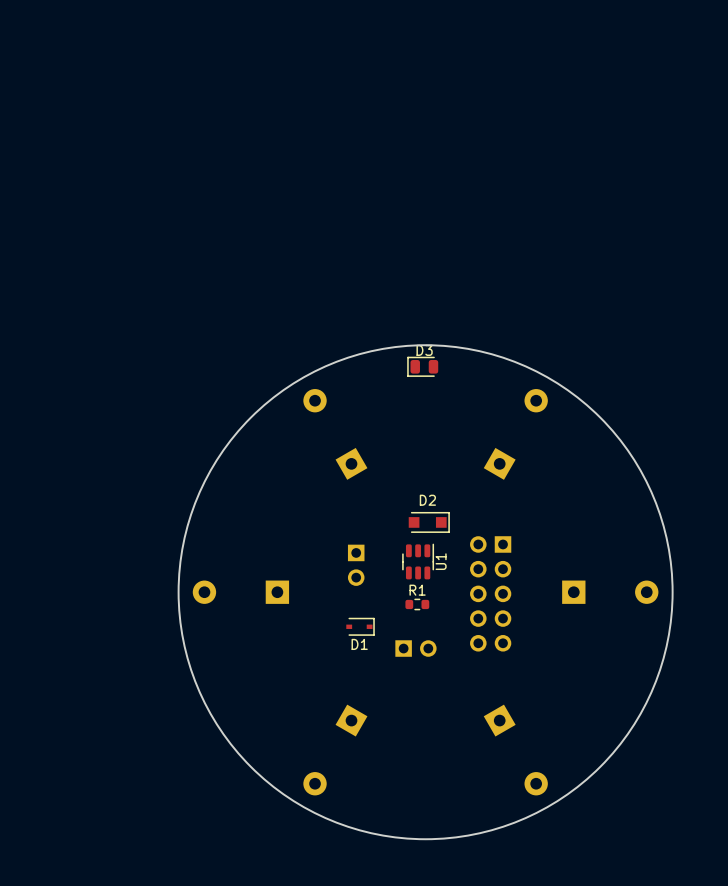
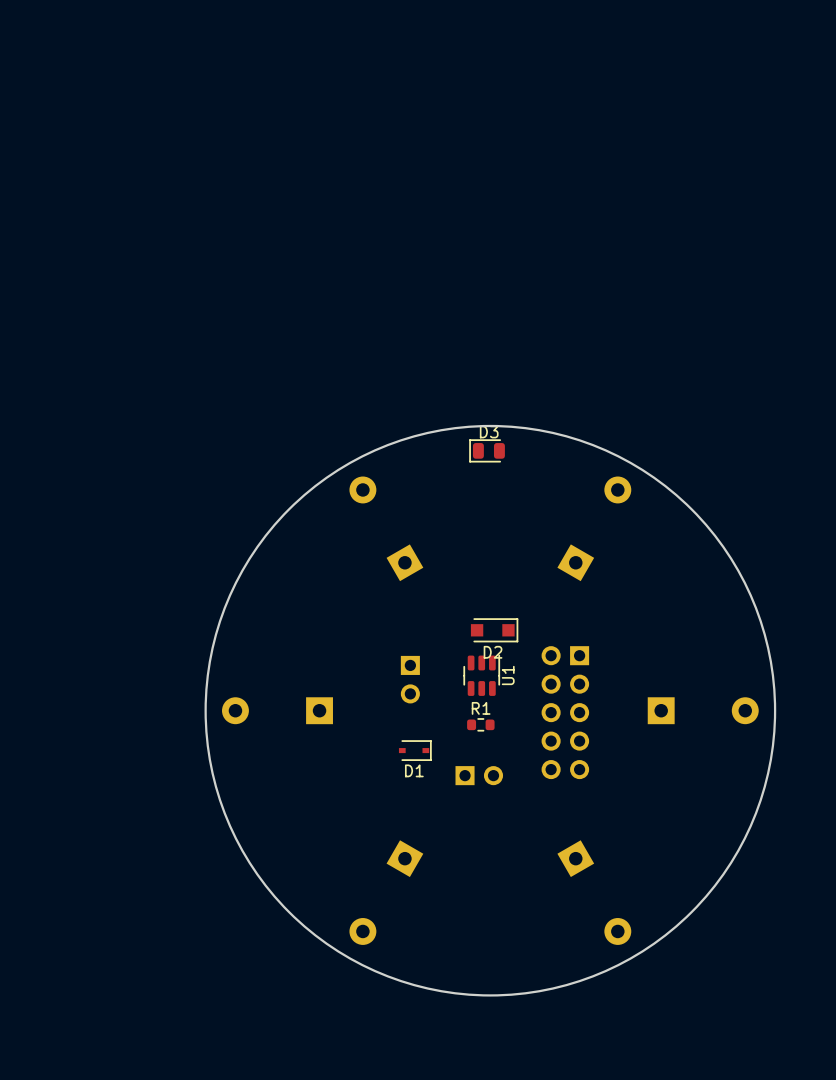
D2 name position: D2 (427, 500) -> D2 (493, 652)

